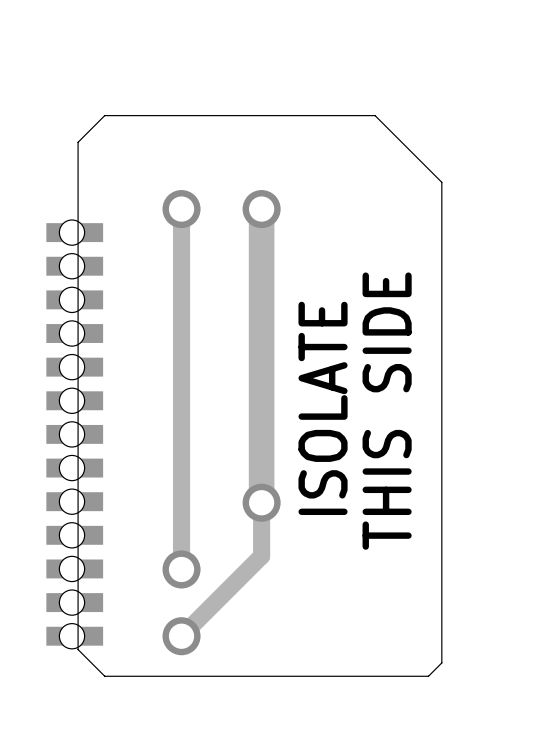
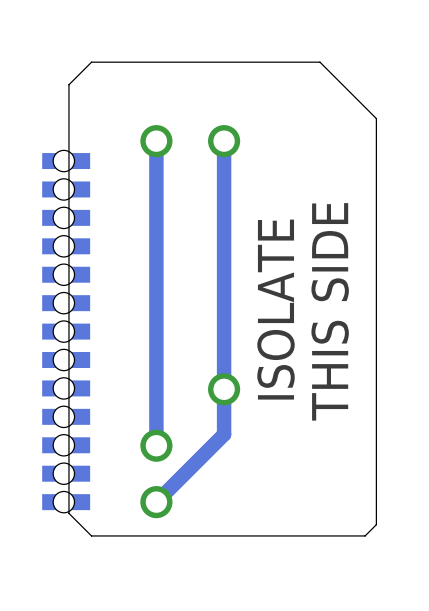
track width: thick (261, 209) (261, 502) -> thin (224, 141) (224, 389)

